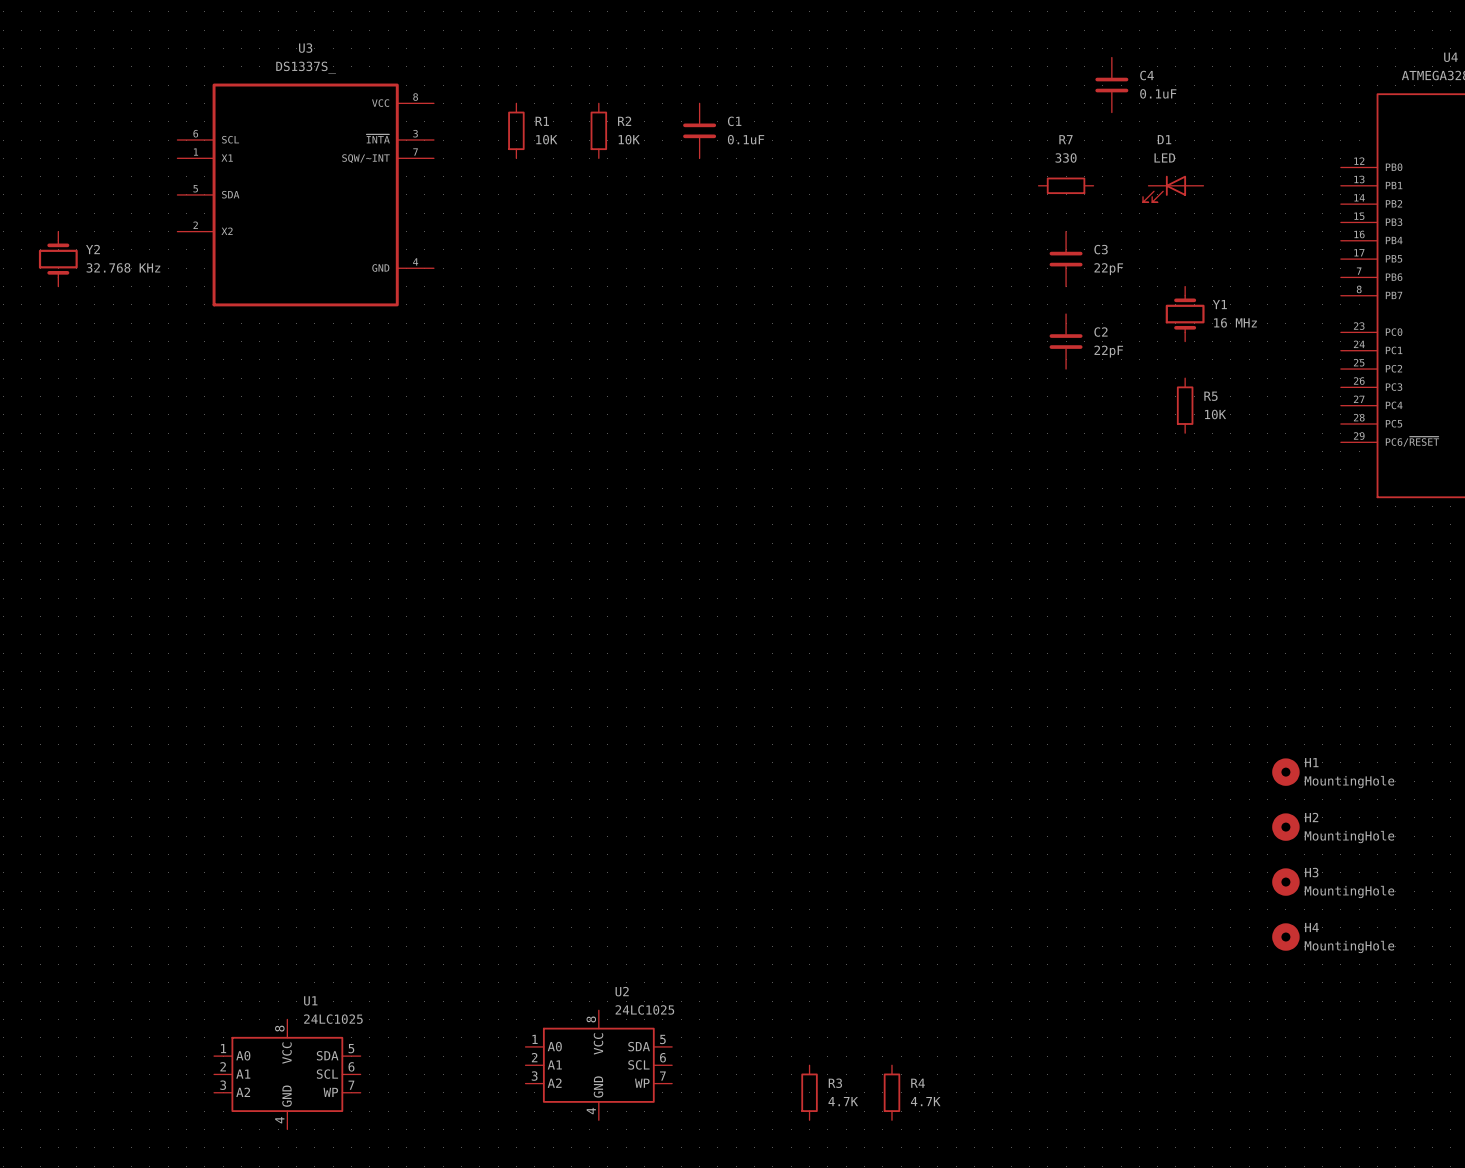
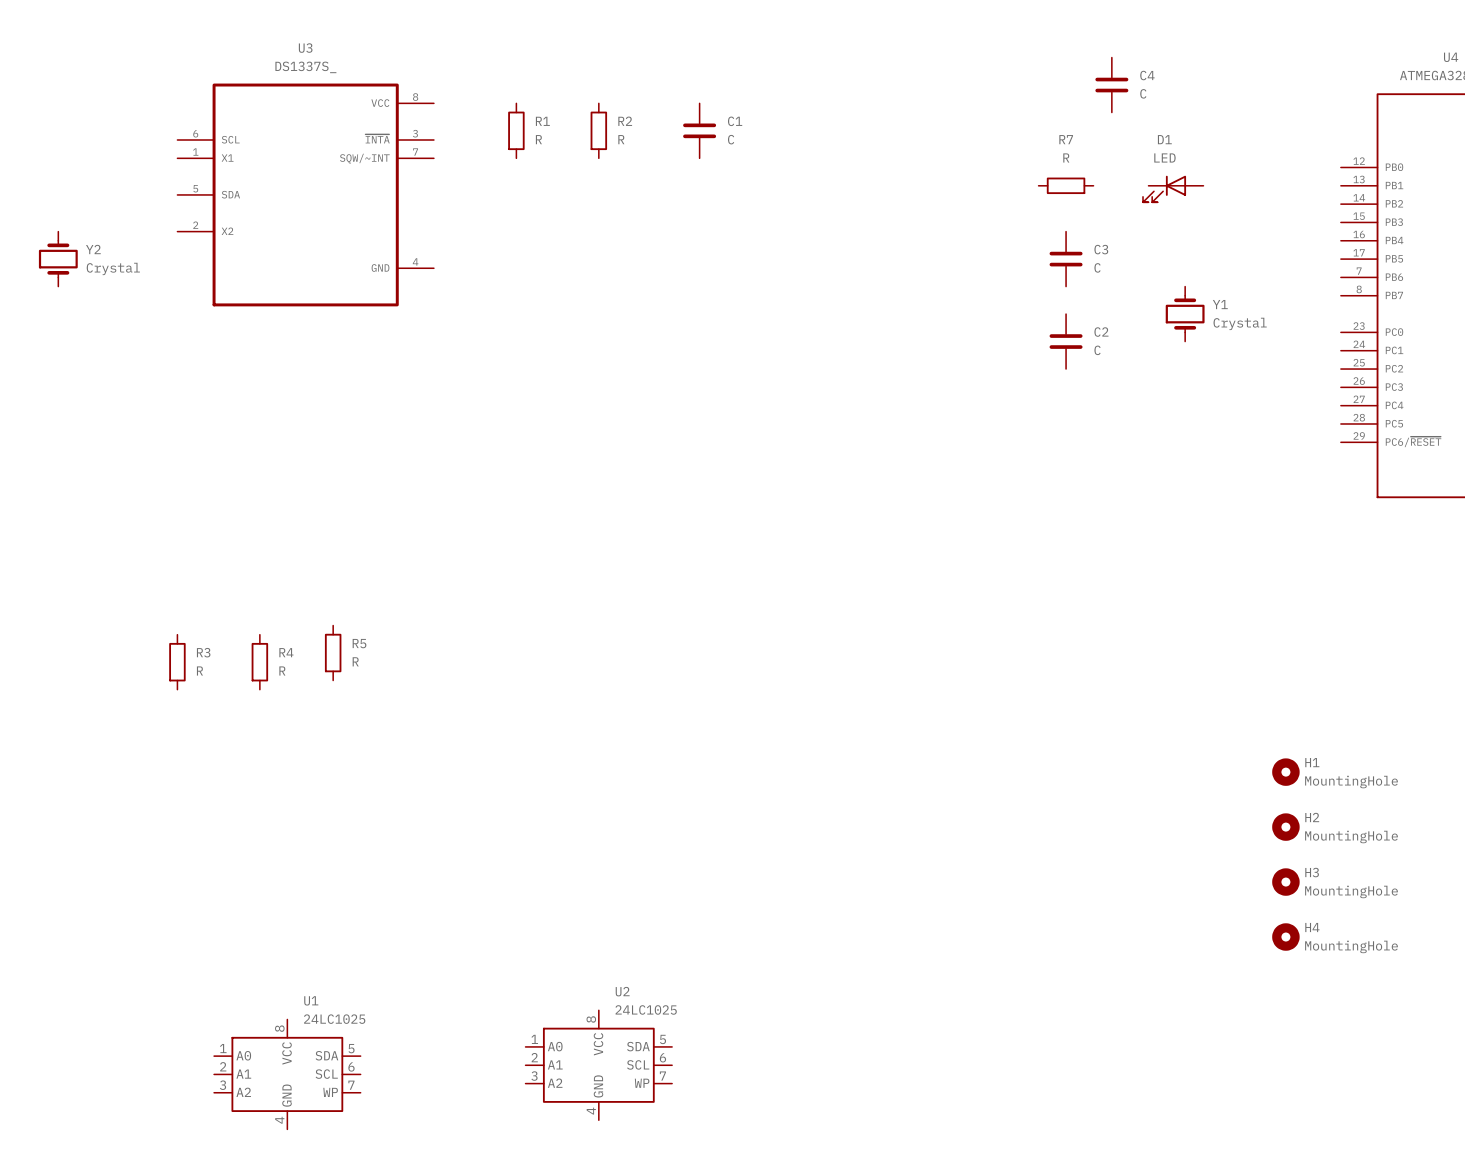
C4 value: 0.1uF (1158, 93) -> C (1143, 93)
R1 value: 10K (546, 139) -> R (538, 139)
R2 value: 10K (629, 139) -> R (621, 139)
C1 value: 0.1uF (746, 139) -> C (731, 139)
R7 value: 330 (1066, 157) -> R (1066, 157)
Y2 value: 32.768 KHz (123, 267) -> Crystal (113, 268)
C3 value: 22pF (1108, 269) -> C (1097, 267)
Y1 value: 16 MHz (1235, 322) -> Crystal (1240, 323)
C2 value: 22pF (1108, 351) -> C (1097, 350)
R5 position: (1185, 405) -> (333, 653)
R5 value: 10K (1215, 414) -> R (355, 661)
R3 position: (809, 1092) -> (177, 662)
R4 position: (891, 1092) -> (259, 662)
R3 value: 4.7K (843, 1101) -> R (199, 671)
R4 value: 4.7K (925, 1101) -> R (282, 671)

